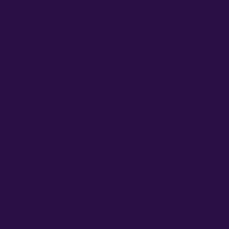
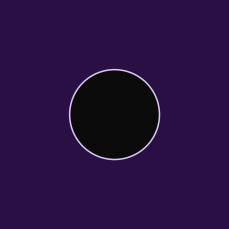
part: none -> (114, 114)

